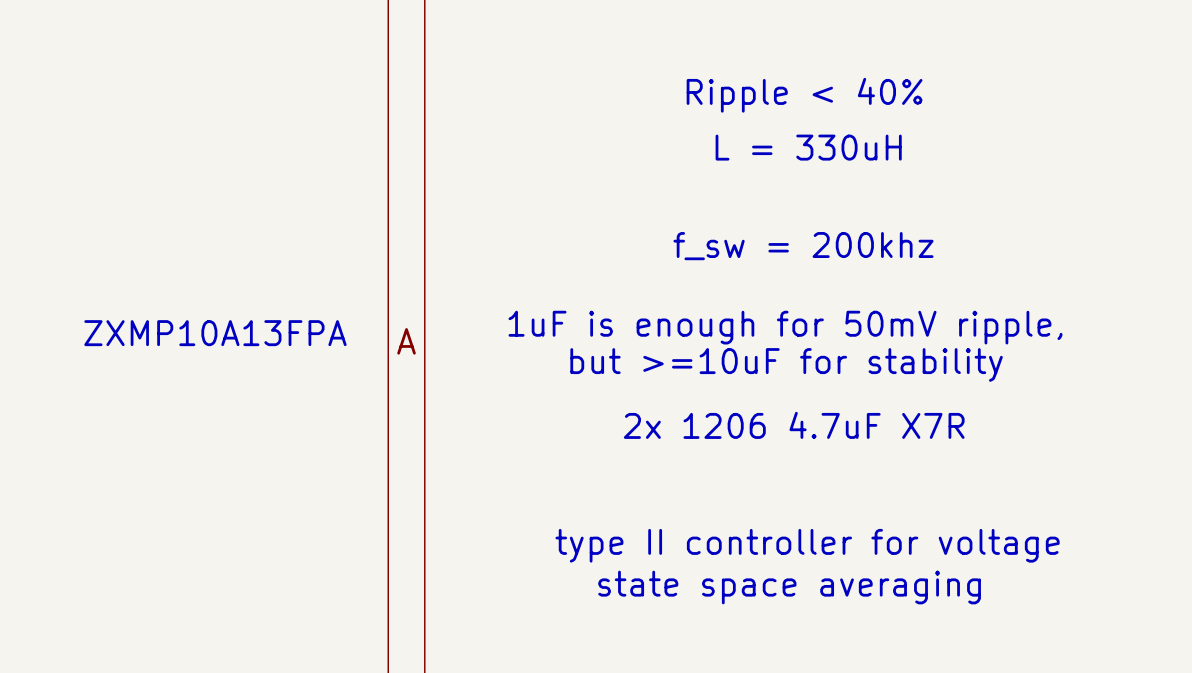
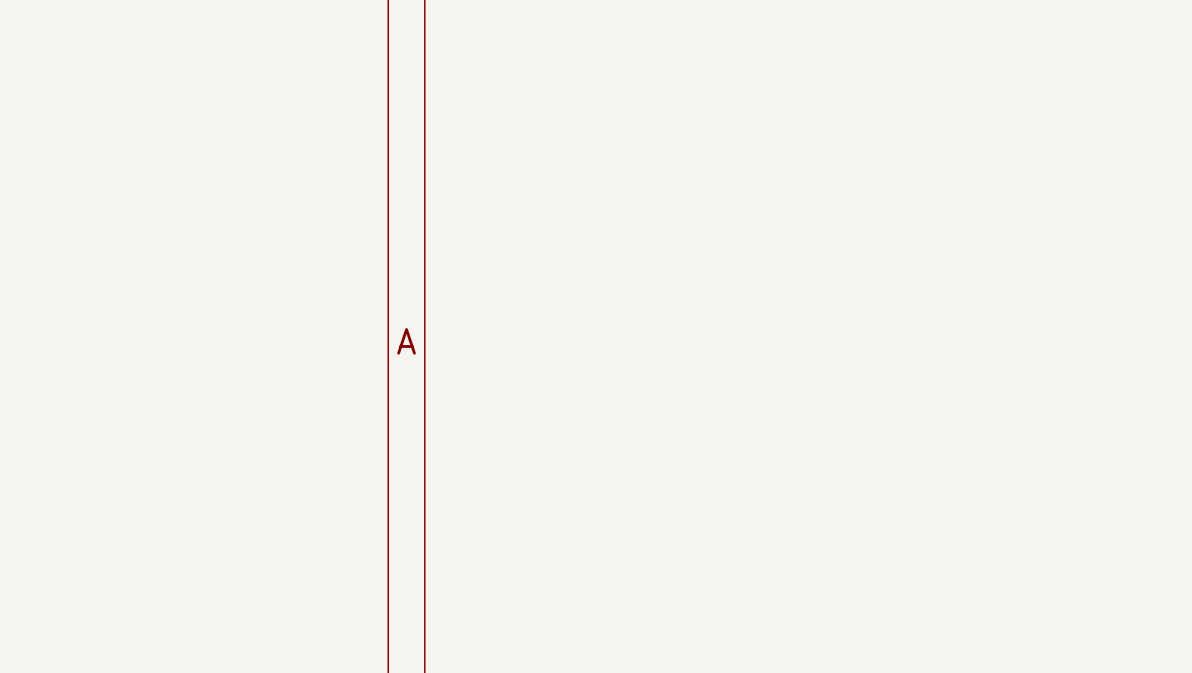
text: Ripple < 40% (804, 95) -> none
text: L = 330uH (808, 147) -> none
text: f_sw = 200khz (803, 246) -> none
text: 1uF is enough for 50mV ripple, (785, 327) -> none
text: ZXMP10A13FPA (215, 333) -> none
text: but >=10uF for stability (786, 364) -> none
text: 2x 1206 4.7uF X7R (794, 425) -> none
text: type II controller for voltage (807, 545) -> none
text: state space averaging (789, 587) -> none

